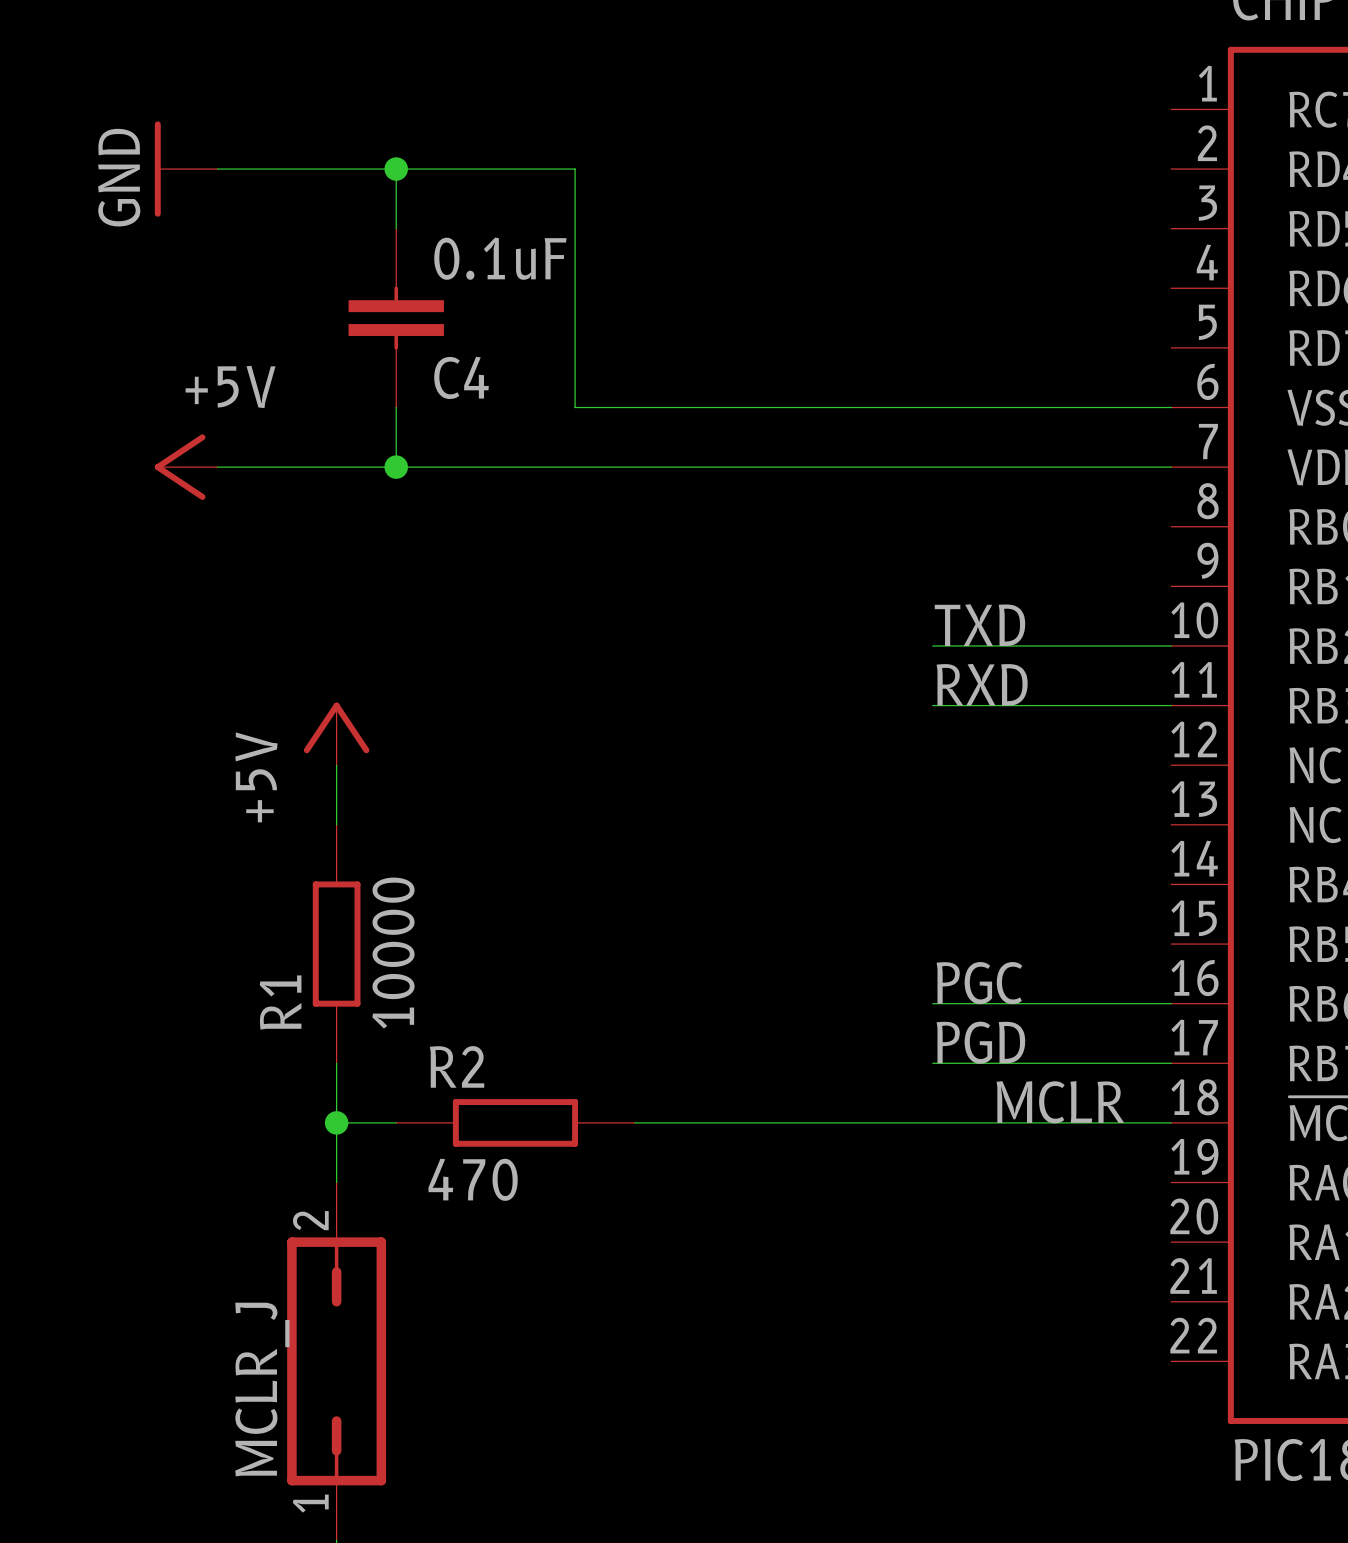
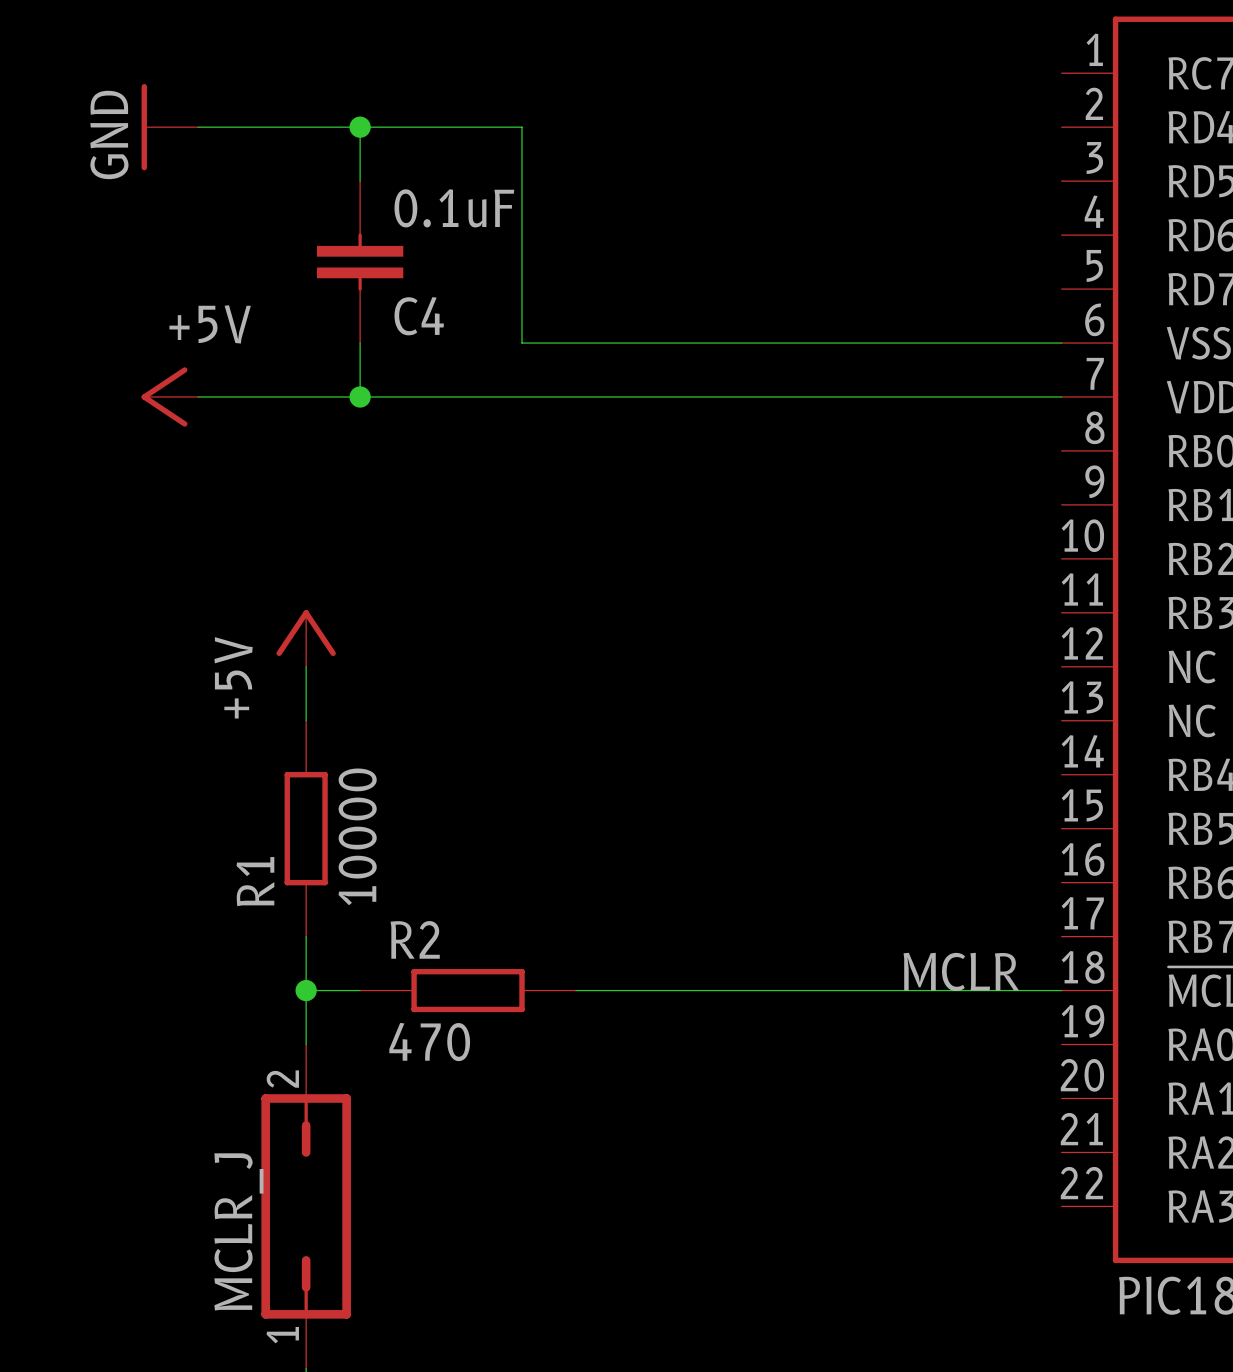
label: TXD (979, 625) -> none
wire: (932, 645) (1171, 645) -> none
label: RXD (982, 684) -> none
wire: (932, 705) (1171, 705) -> none
label: PGC (979, 983) -> none
wire: (932, 1003) (1171, 1003) -> none
label: PGD (980, 1042) -> none
wire: (932, 1063) (1171, 1063) -> none

